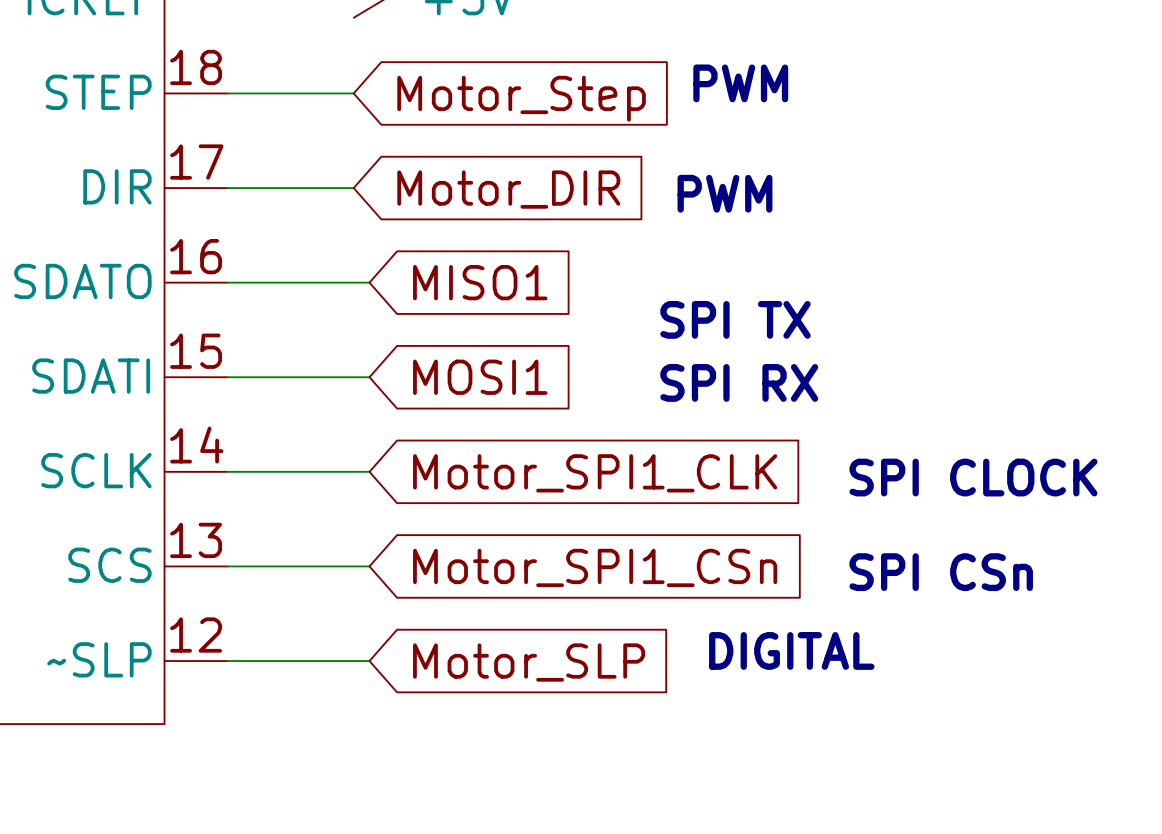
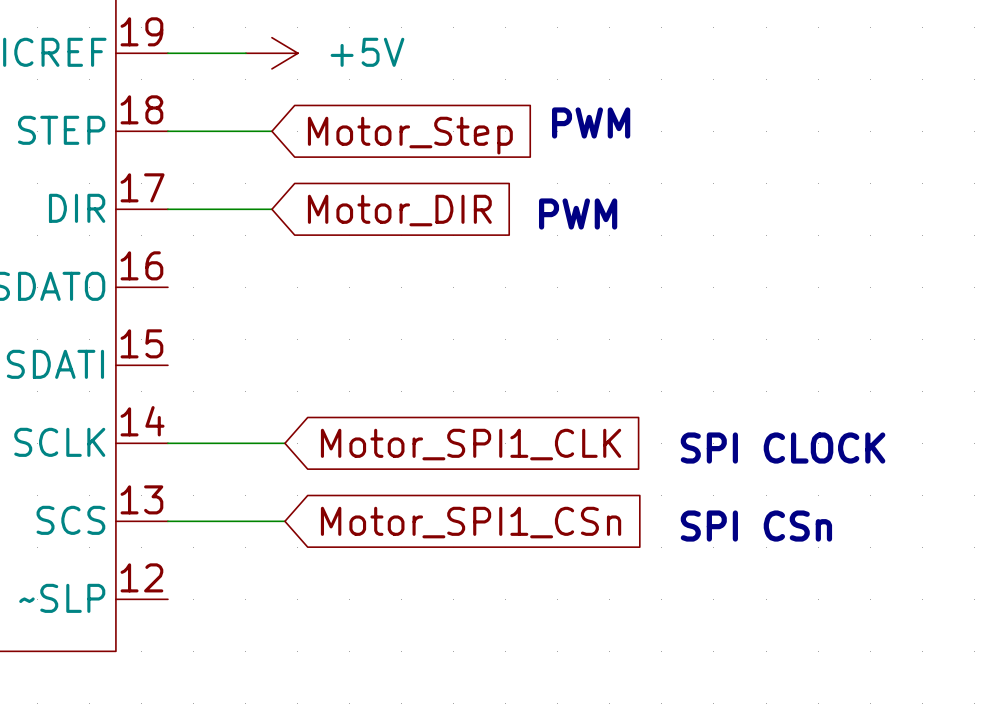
wire: (227, 282) (369, 282) -> none
global label: MISO1 (480, 282) -> none
text: SPI TX (735, 319) -> none
wire: (227, 377) (369, 377) -> none
global label: MOSI1 (480, 377) -> none
text: SPI RX (739, 382) -> none
text: DIGITAL (791, 650) -> none
wire: (227, 661) (369, 661) -> none
global label: Motor_SLP (529, 662) -> none

